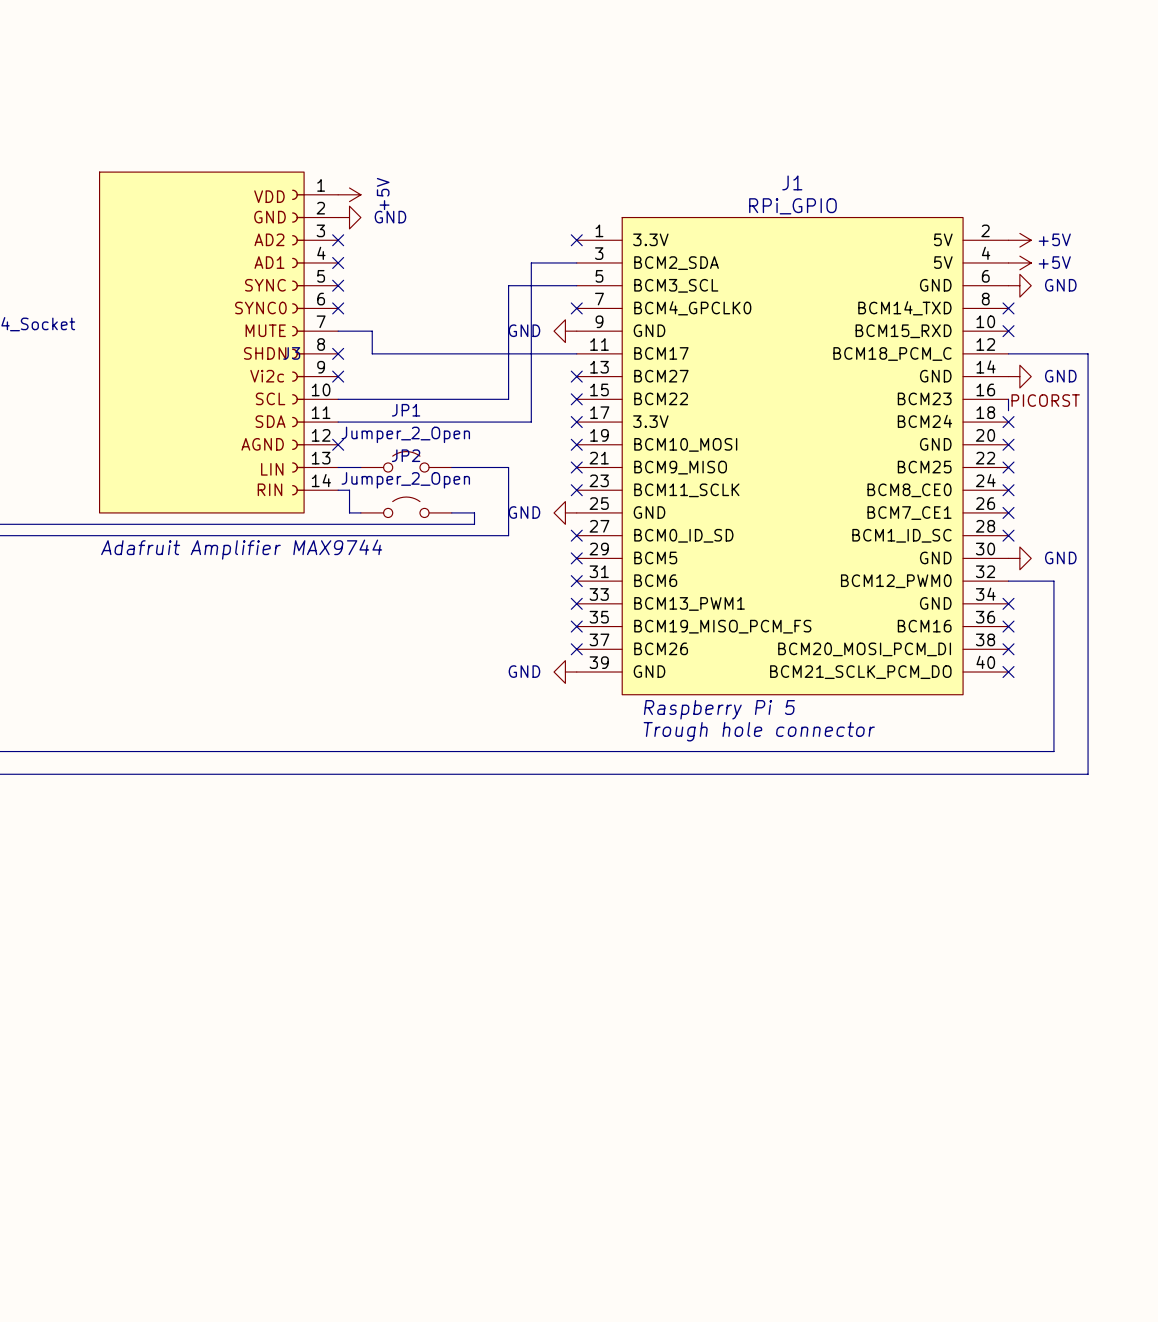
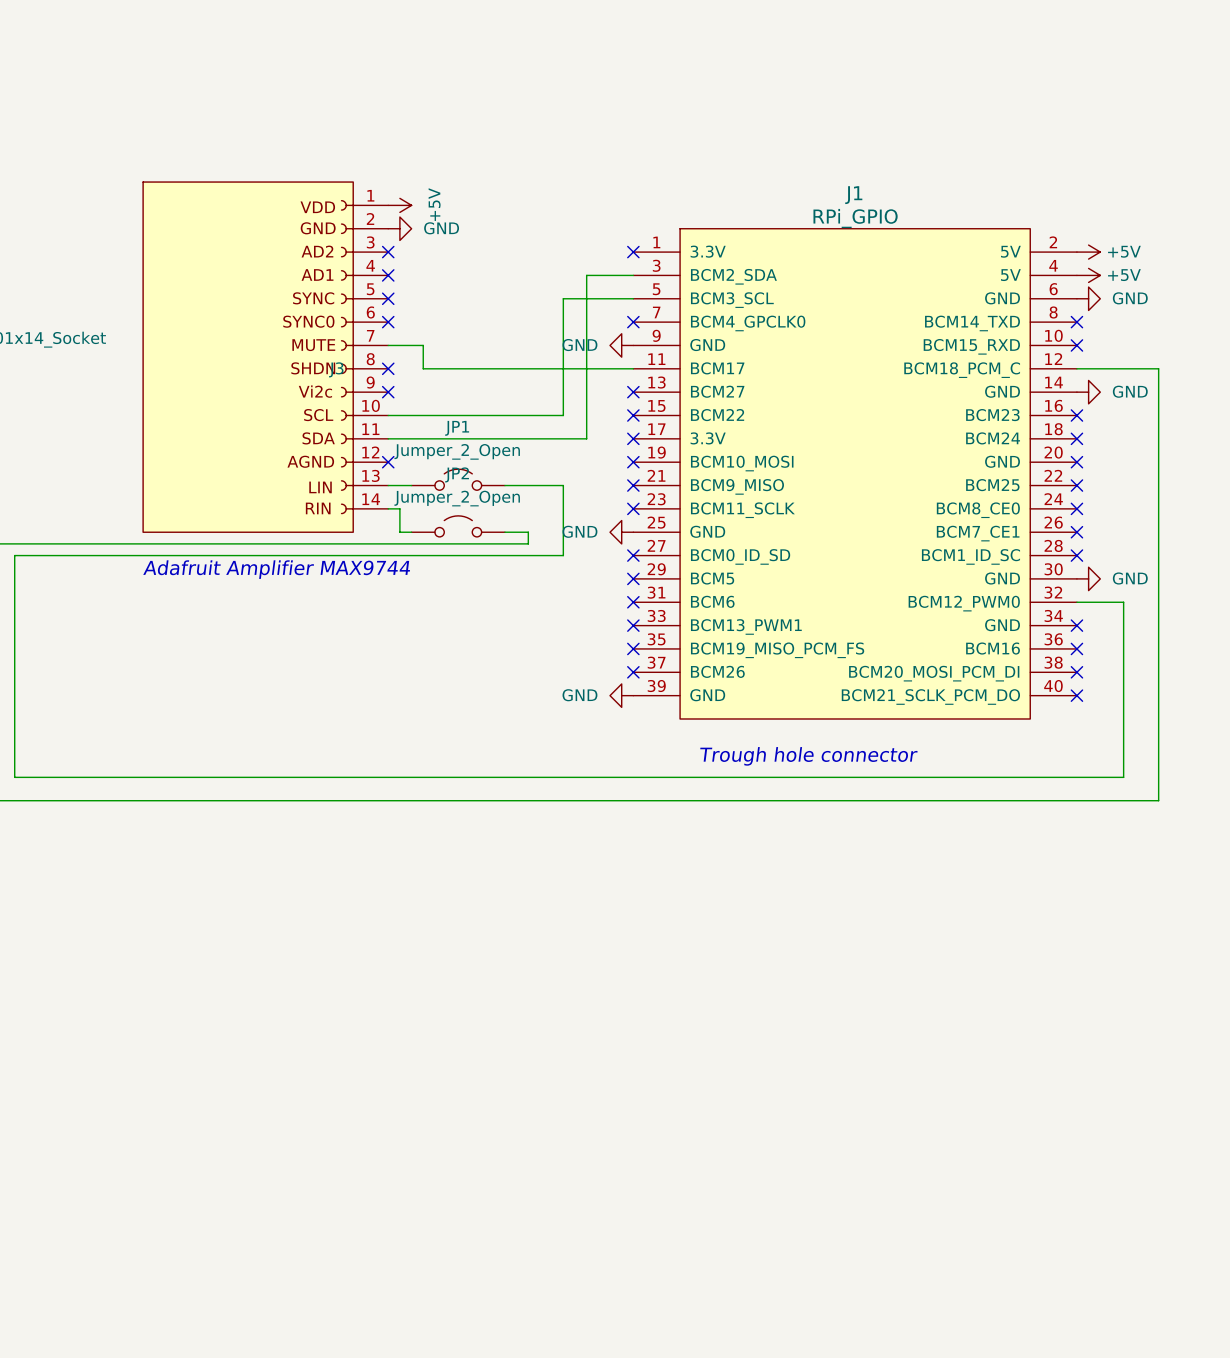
wire: (1008, 399) (1008, 410) -> none
no-connect mark: none -> (1076, 415)
label: PICORST (1045, 400) -> none
text: Raspberry Pi 5 (719, 709) -> none

